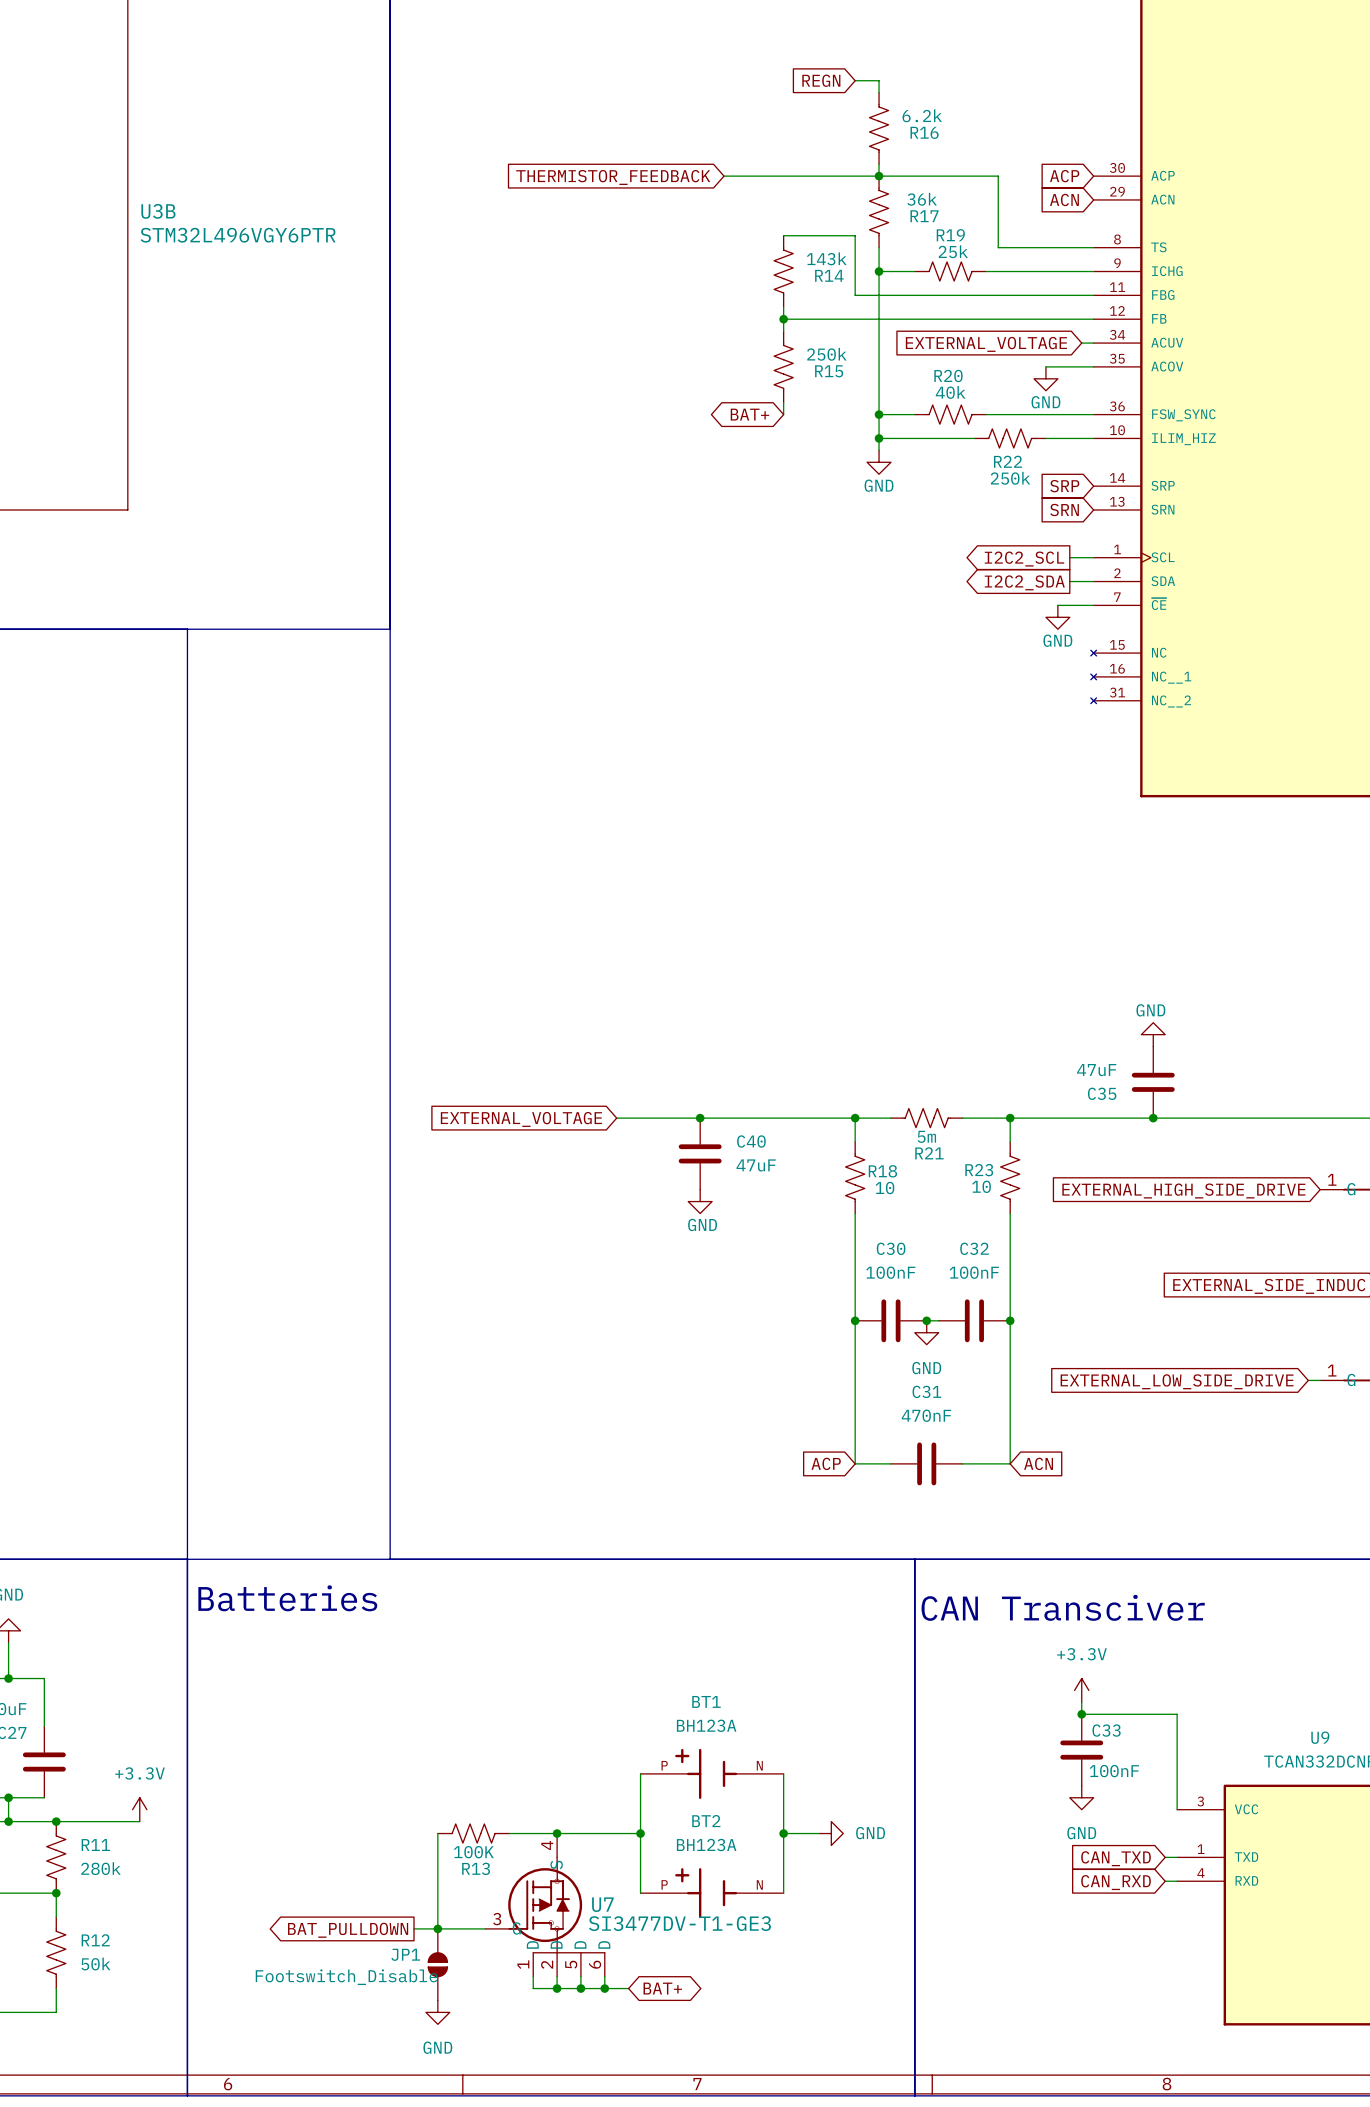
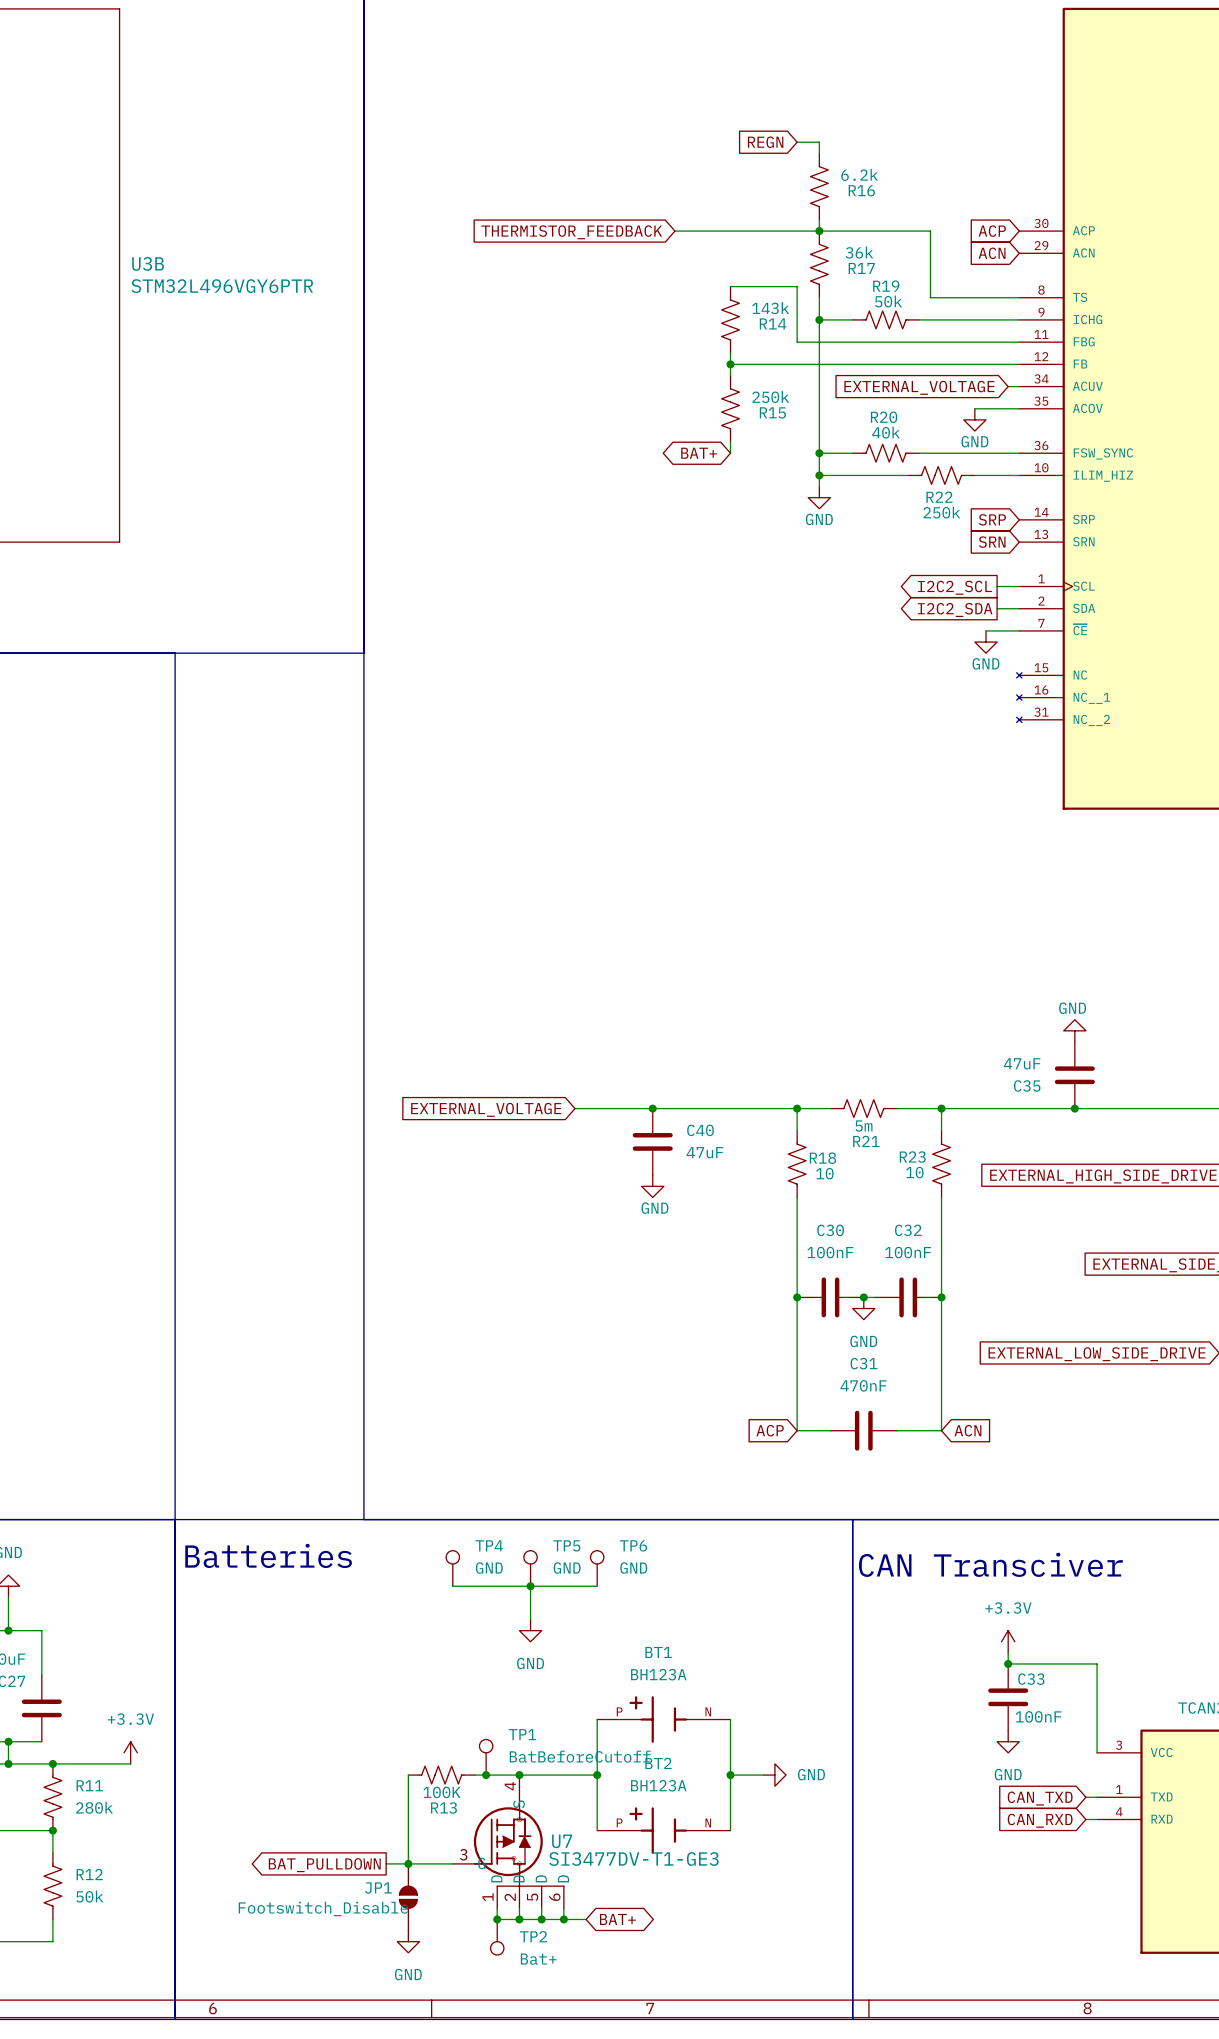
R19 value: 25k (953, 251) -> 50k (888, 301)
TP4: none -> GND (452, 1568)
TP5: none -> GND (530, 1568)
TP6: none -> GND (597, 1568)
wire: none -> (452, 1586) (597, 1586)
wire: none -> (530, 1586) (530, 1619)
junction: none -> (530, 1586)
power symbol: none -> GND (530, 1630)
TP1: none -> BatBeforeCutoff (486, 1757)
junction: none -> (486, 1775)
junction: none -> (497, 1919)
TP2: none -> Bat+ (497, 1937)

